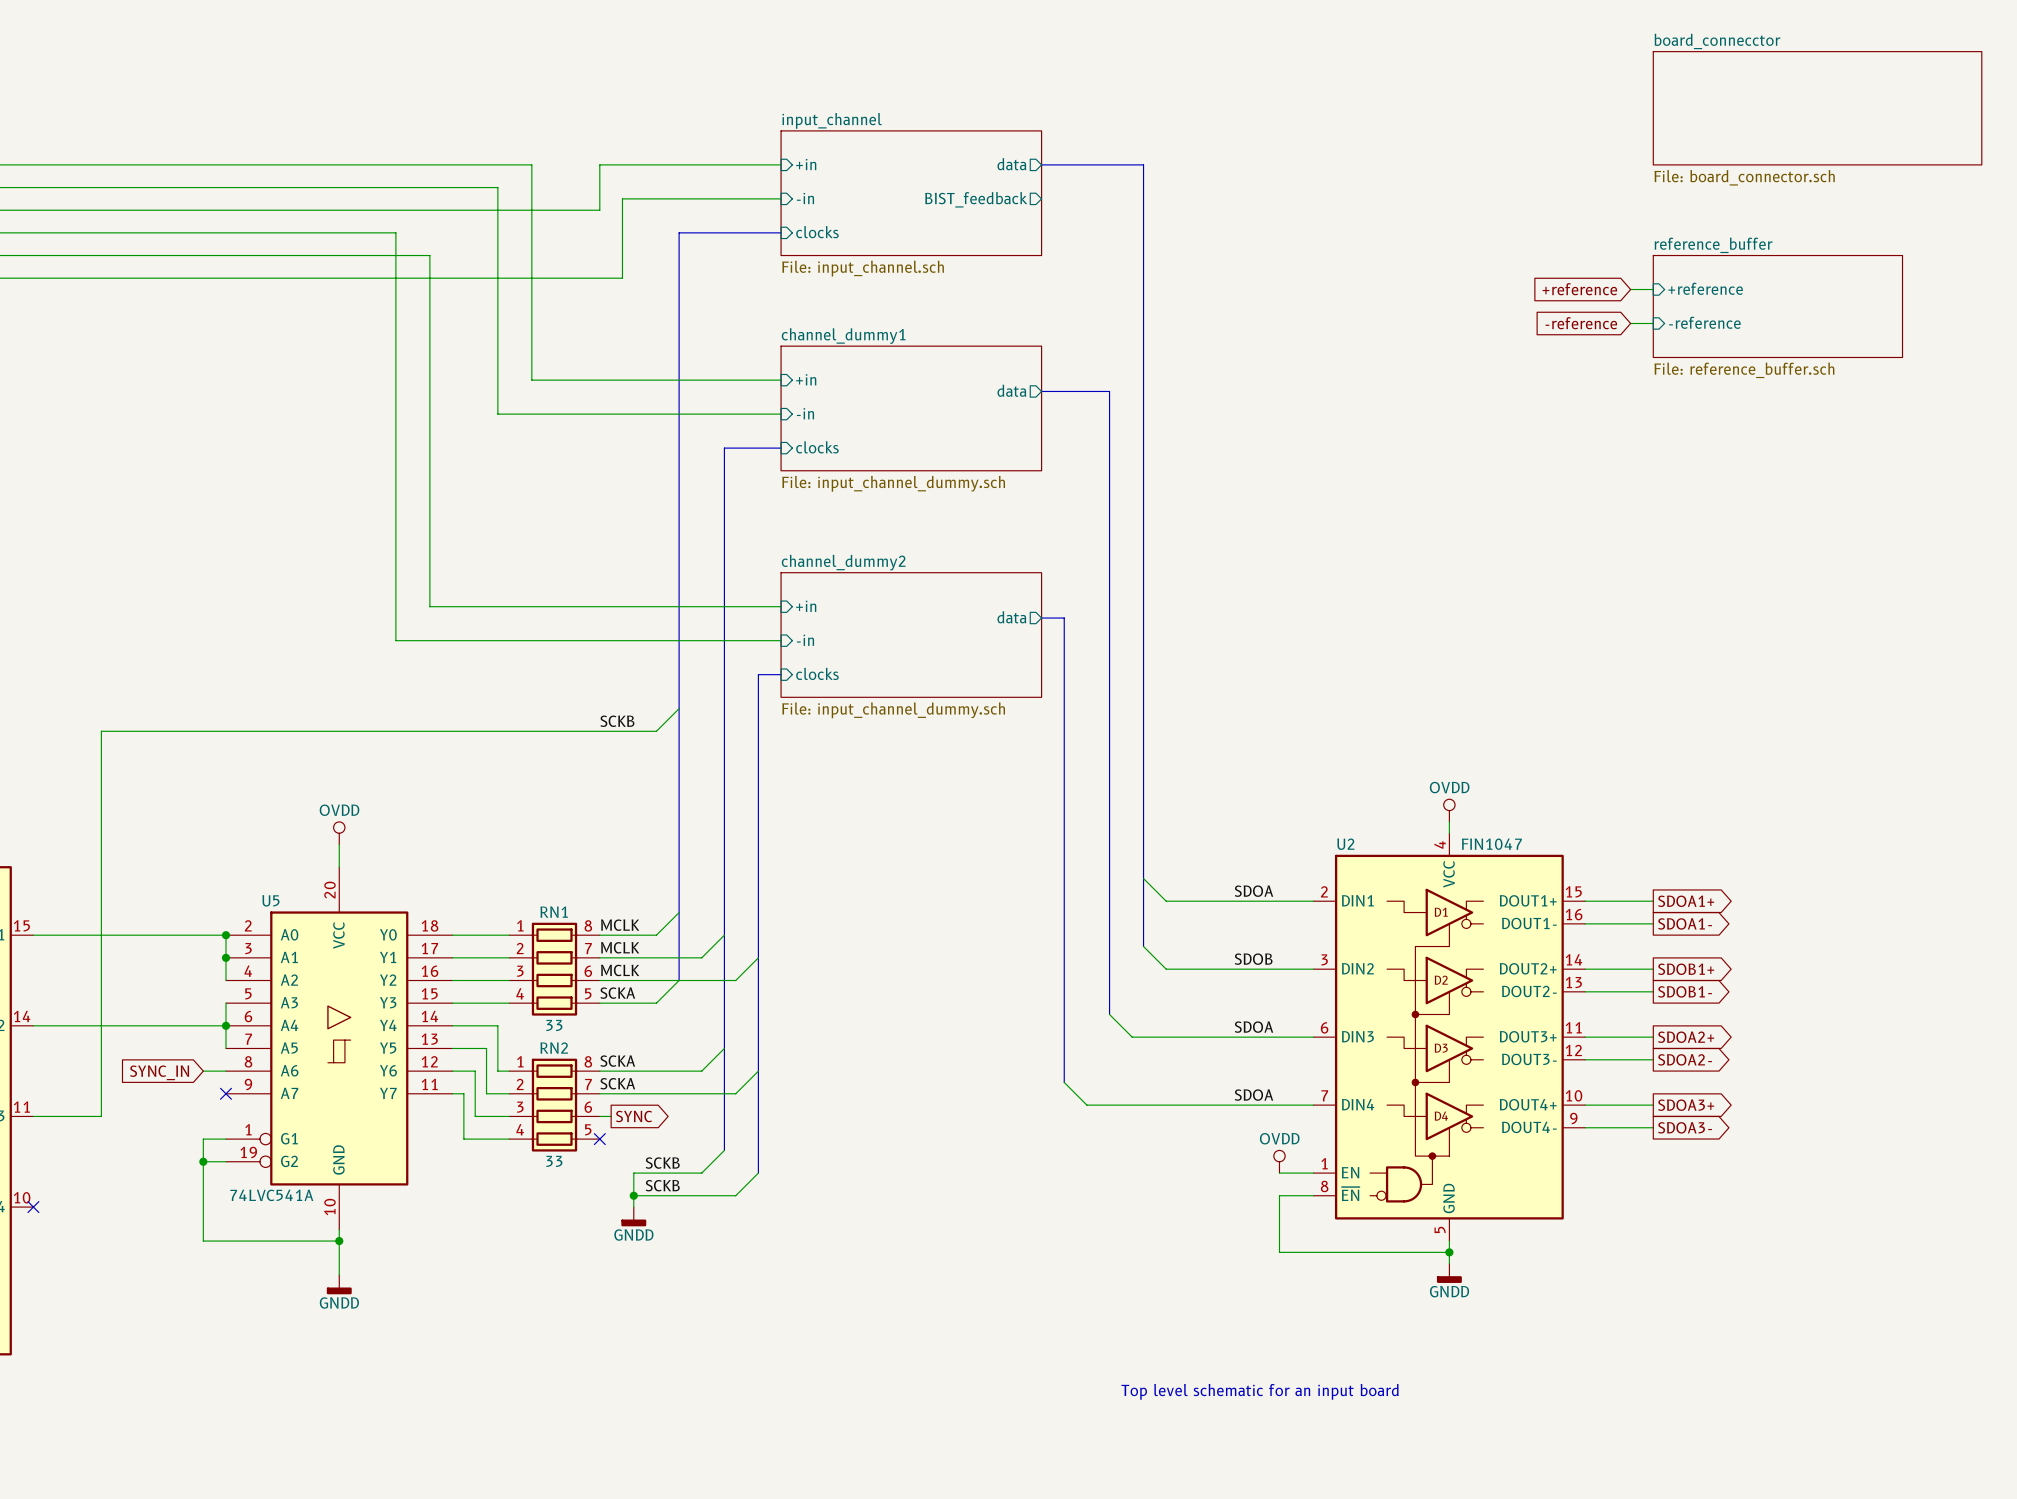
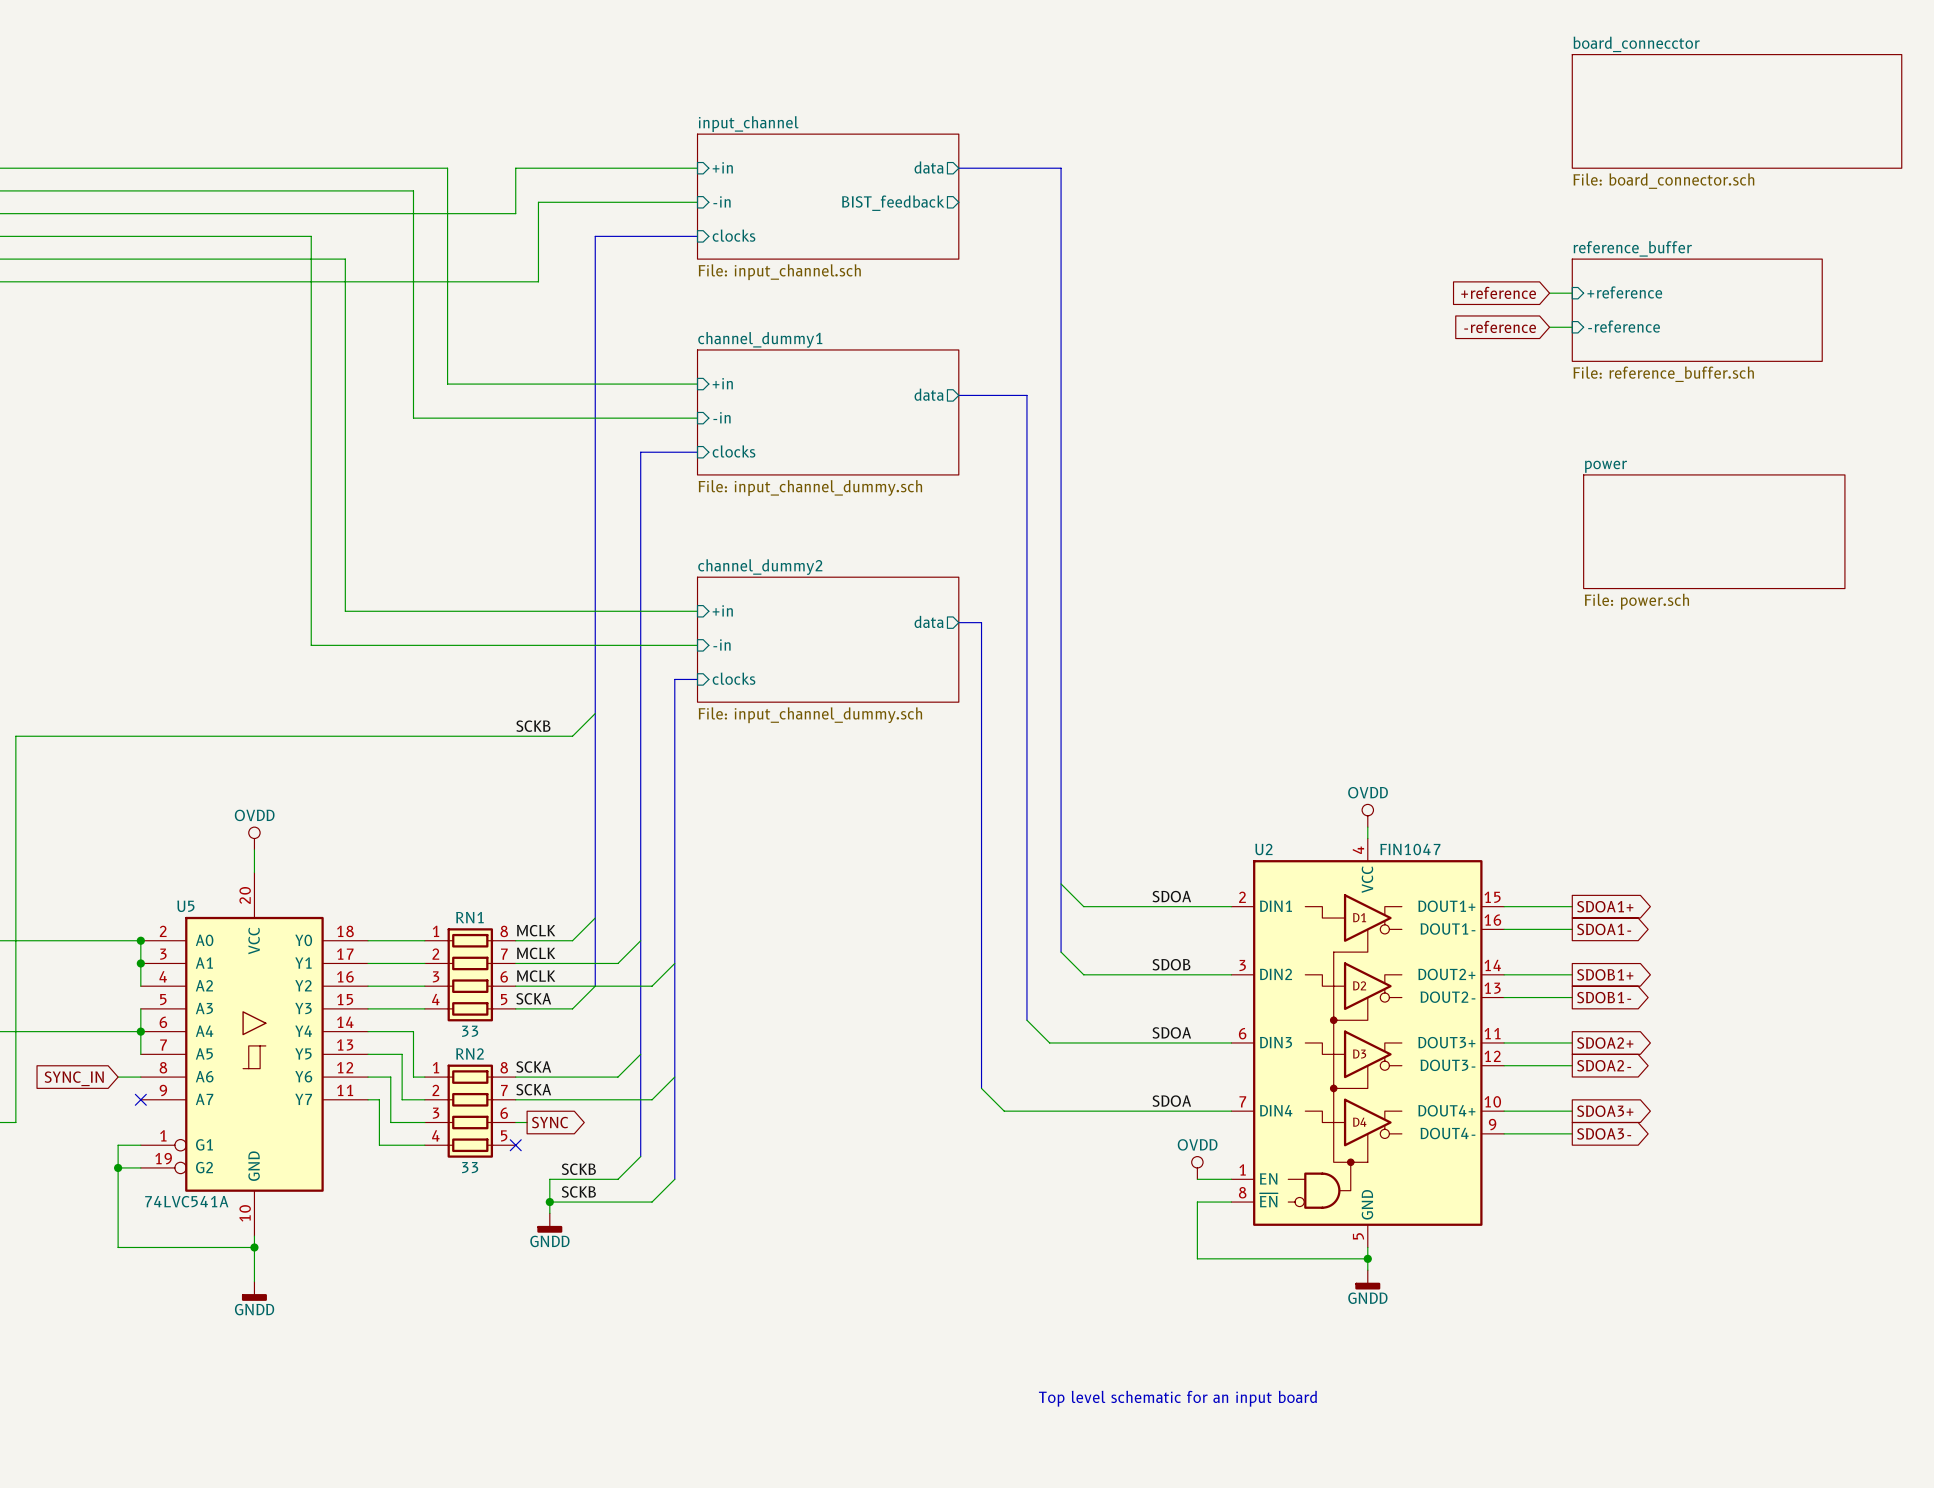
sheet power: none -> File: power.sch (1714, 531)

